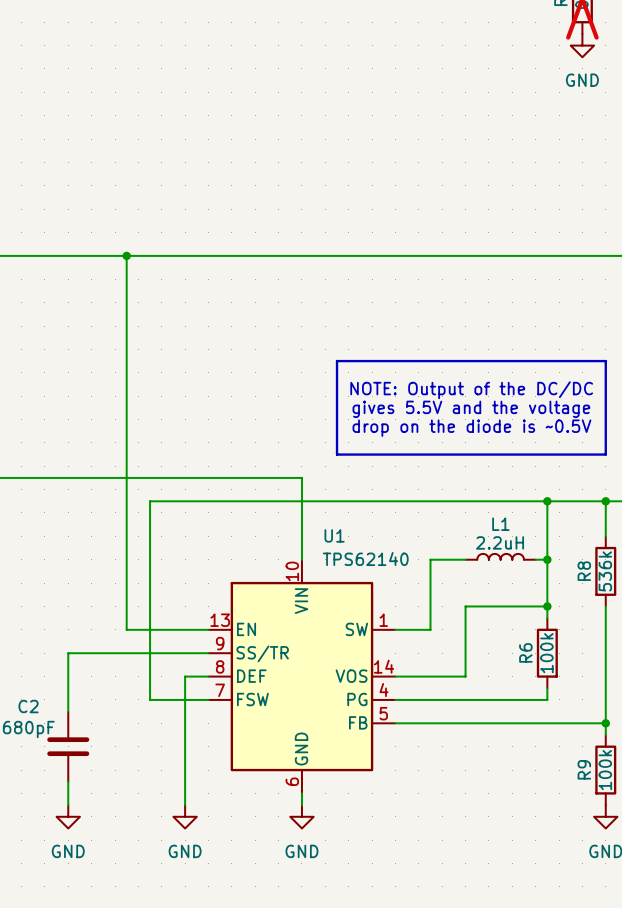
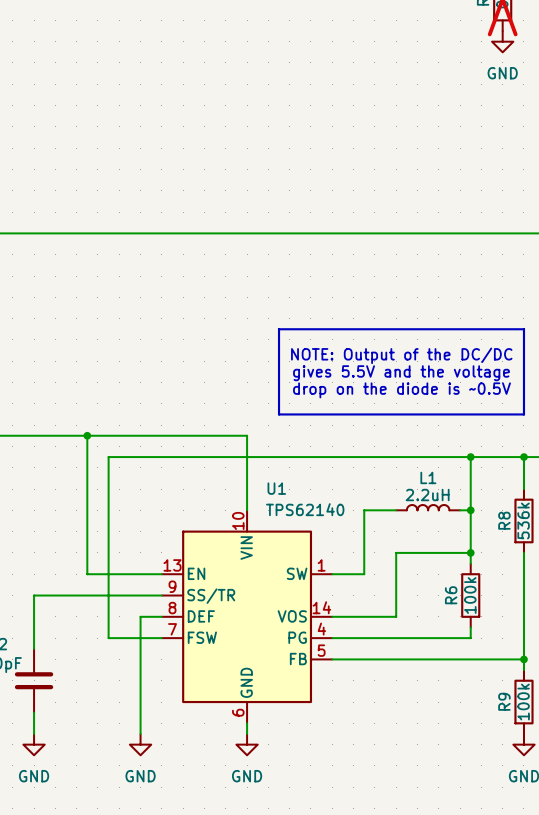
wire: (126, 255) (126, 477) -> none
junction: (126, 255) -> none
junction: none -> (87, 435)

